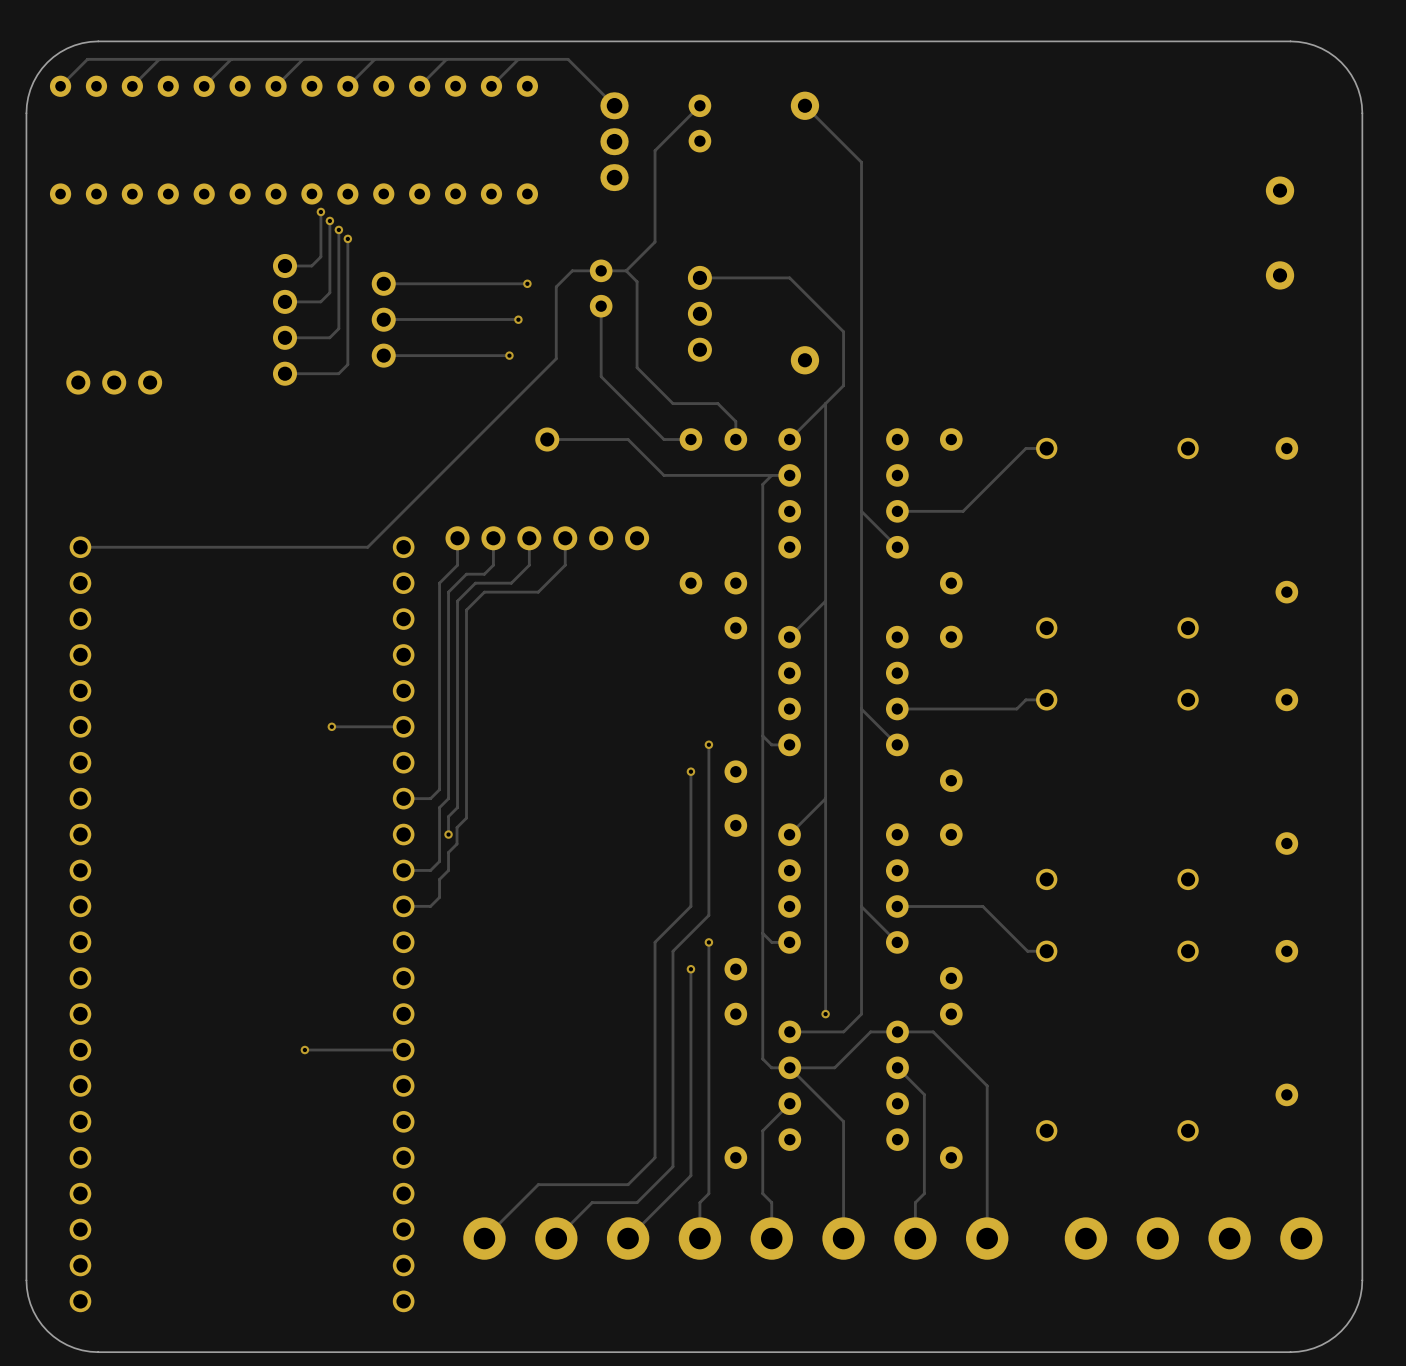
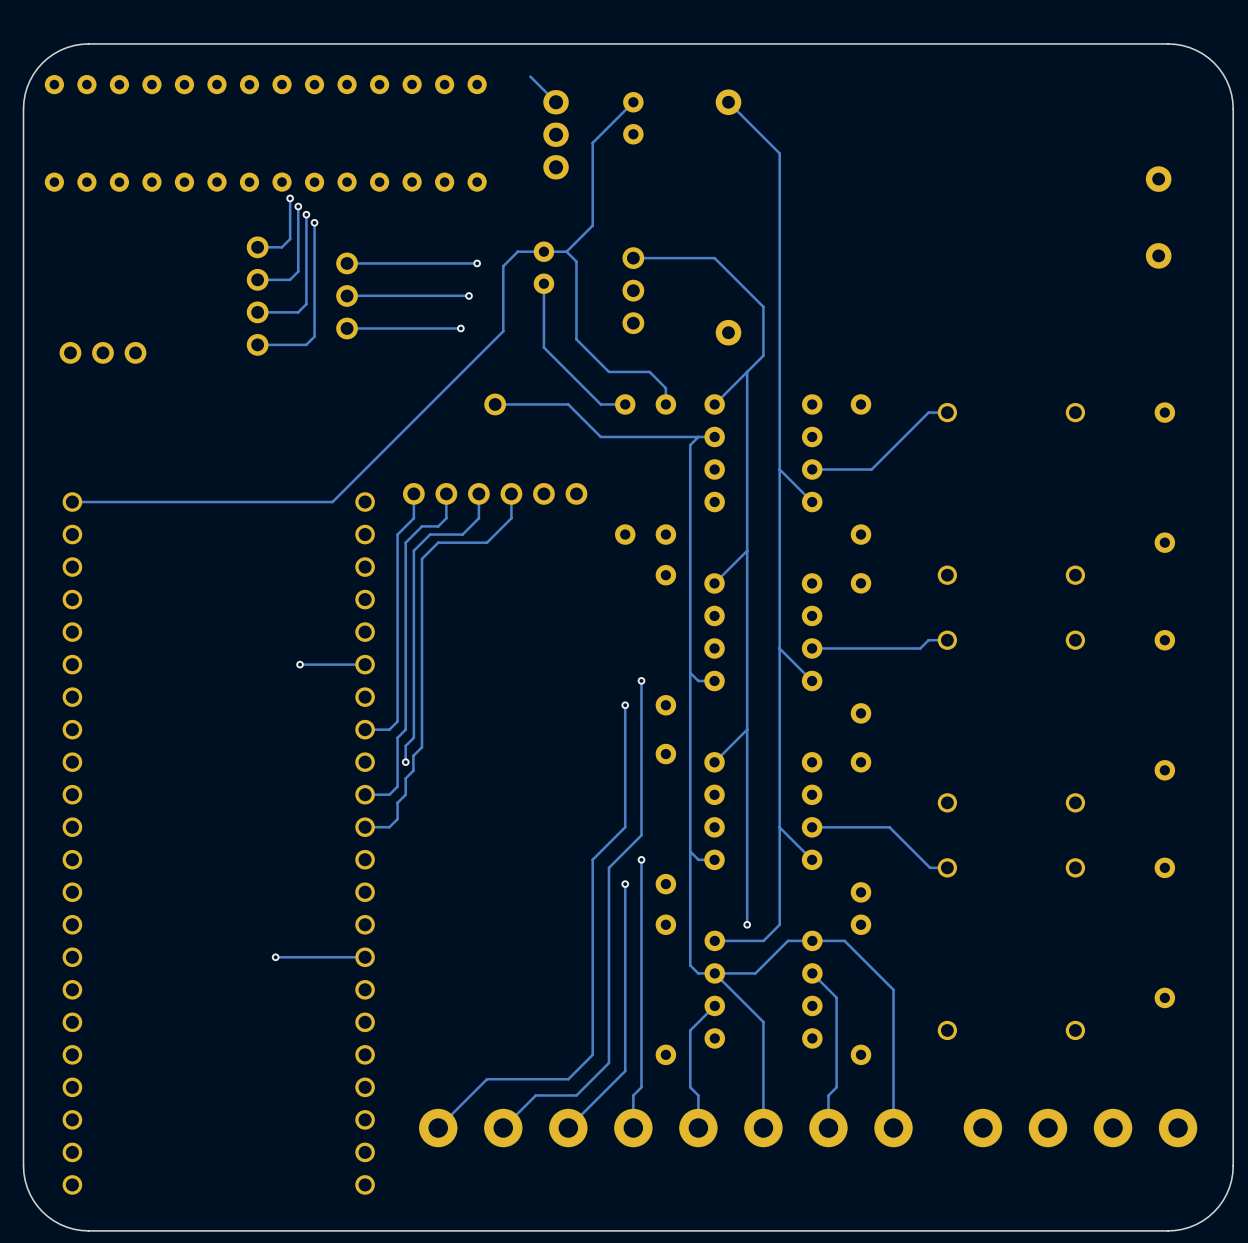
track: (159, 59) (132, 86) -> none
track: (231, 59) (204, 86) -> none
track: (302, 59) (276, 86) -> none
track: (374, 59) (347, 86) -> none
track: (446, 59) (419, 86) -> none
track: (518, 59) (491, 86) -> none
track: (586, 77) (568, 59) (87, 59) (60, 86) -> none

